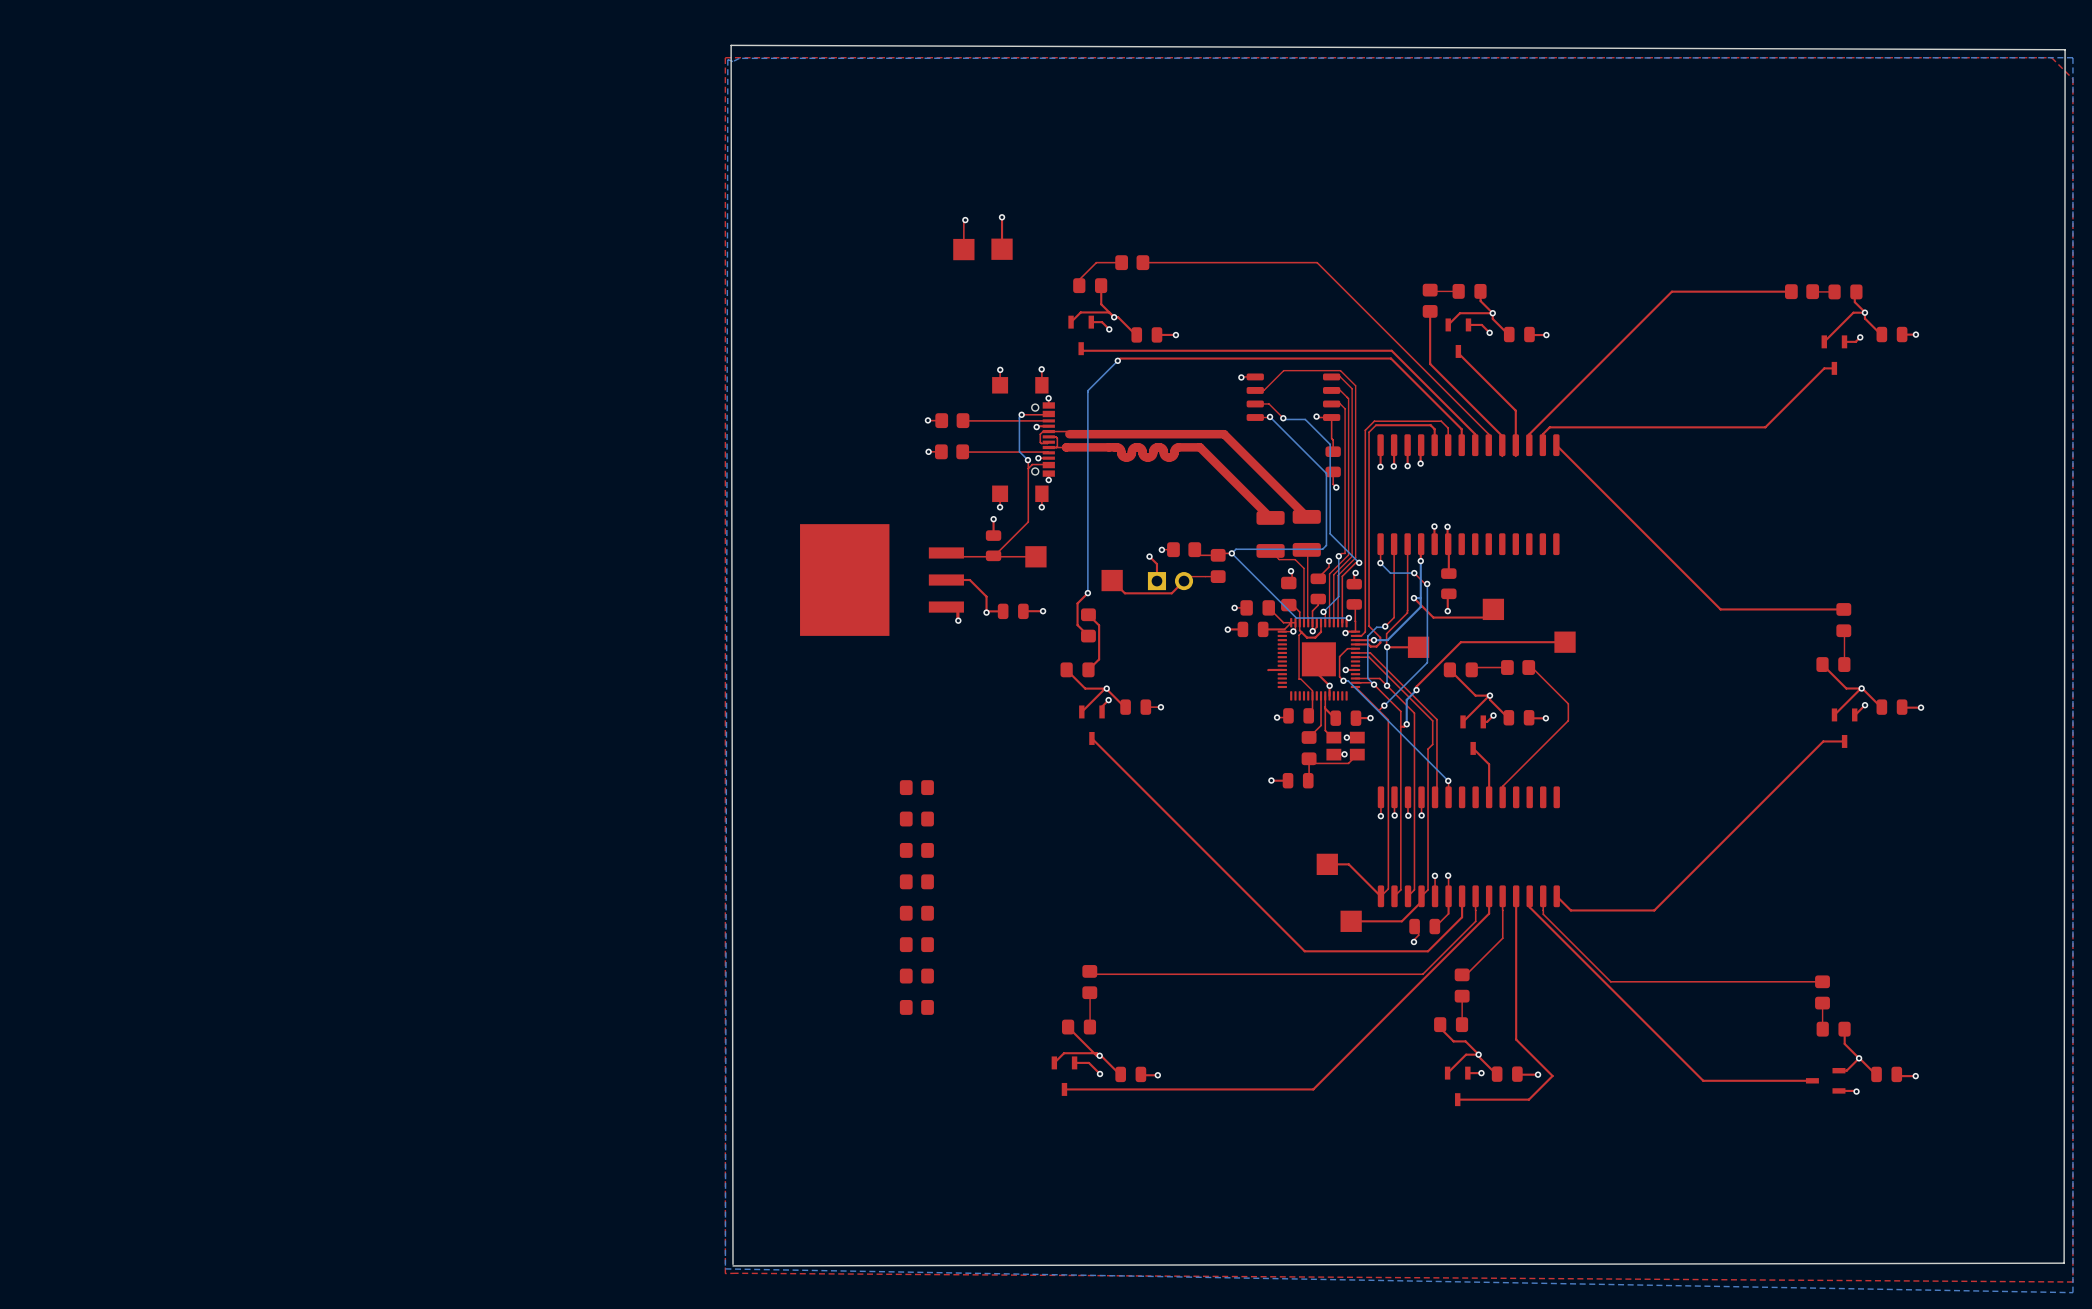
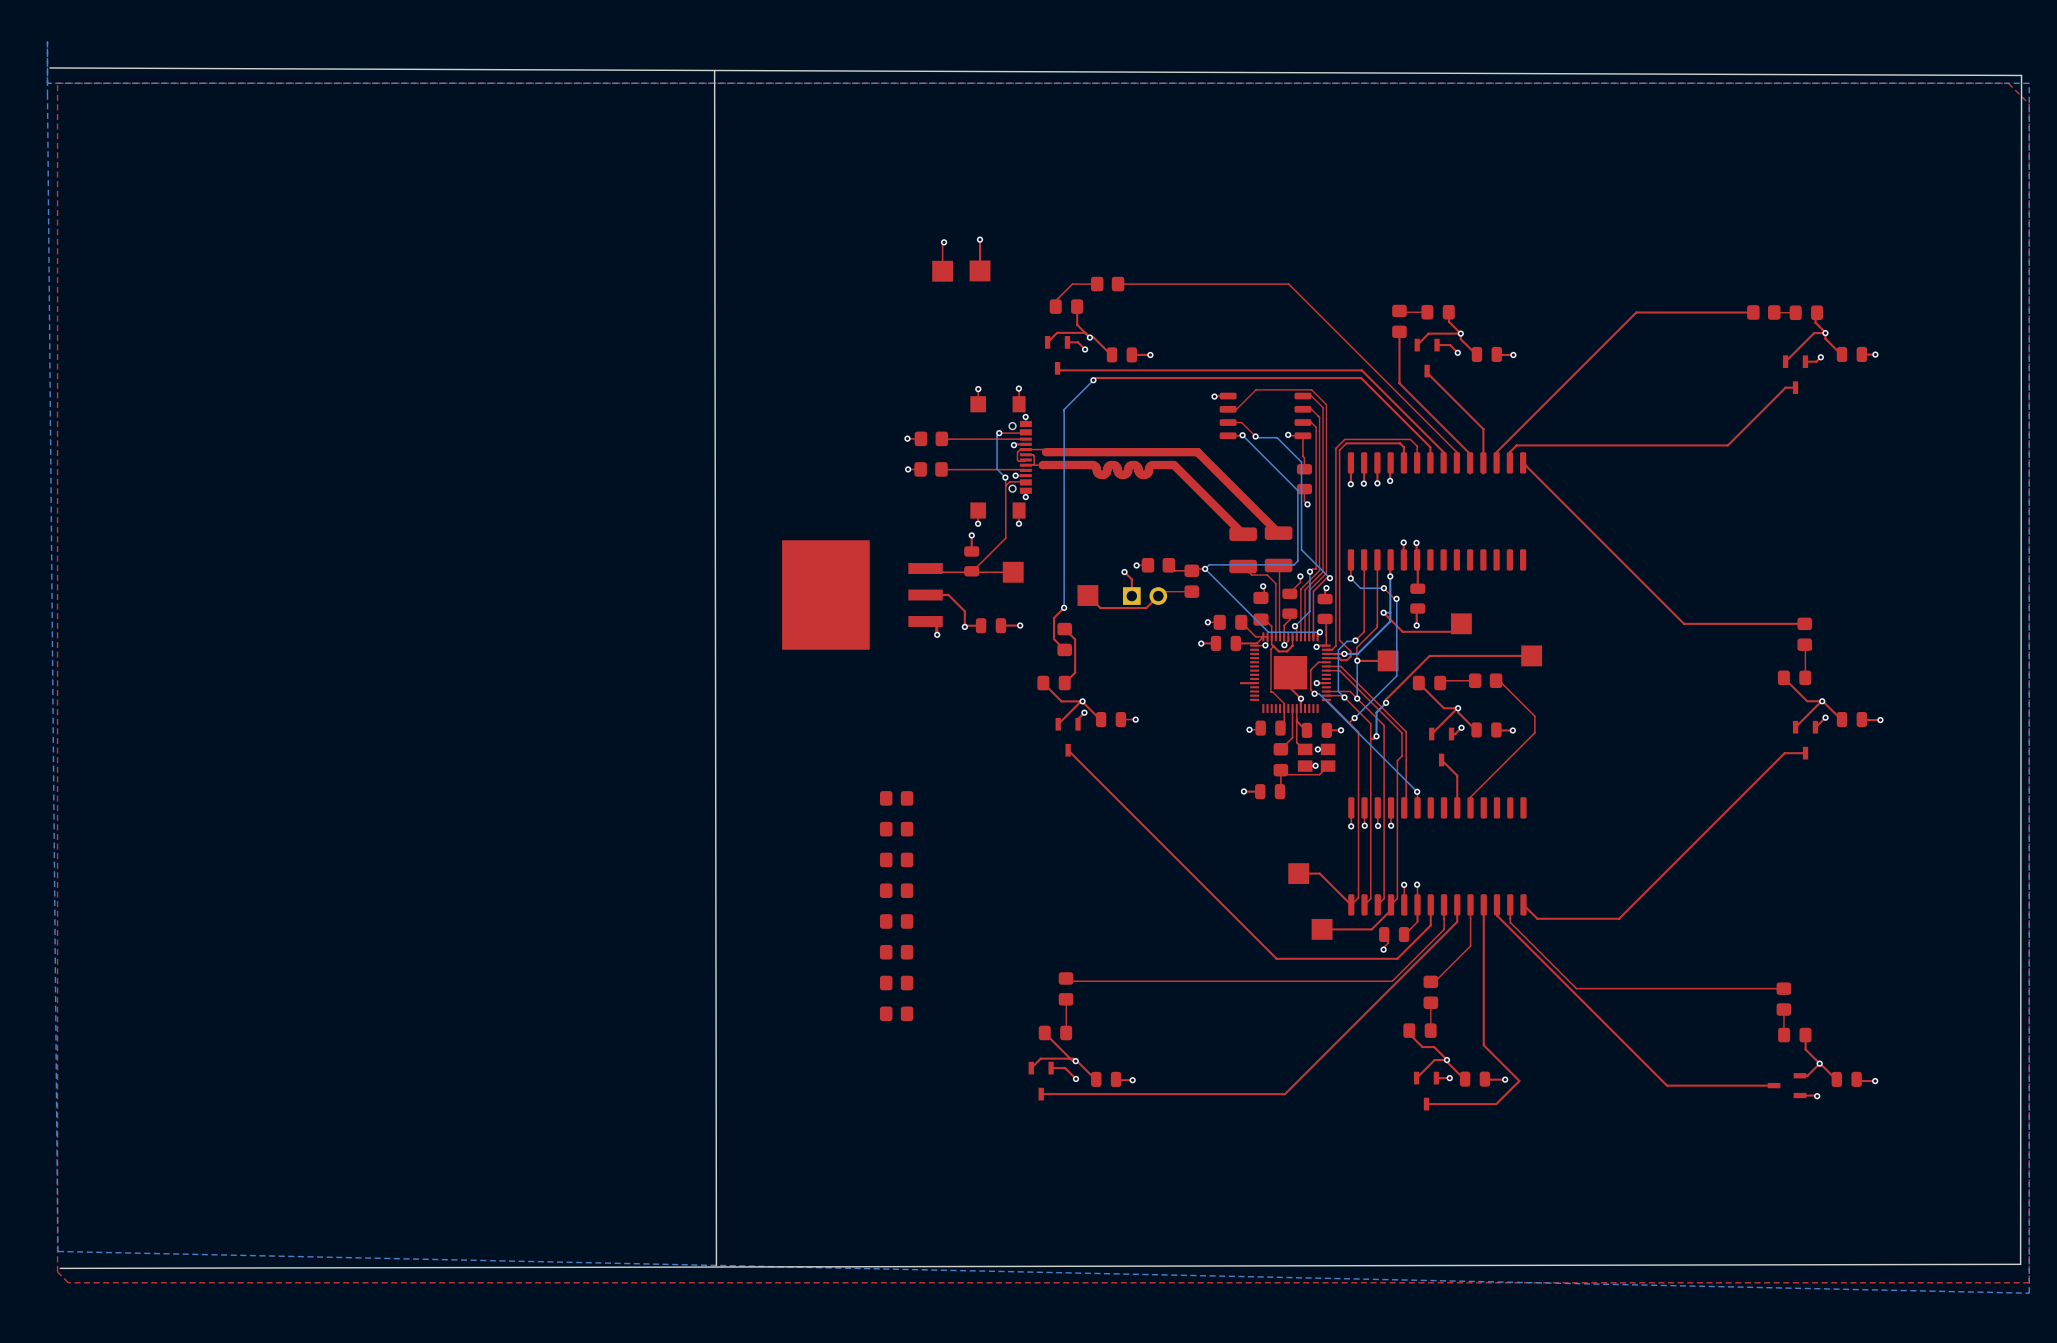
board edge: (731, 45) (2065, 49) -> (49, 67) (2021, 75)
top zone outline: (725, 57) (725, 1273) (2072, 1282) -> (708, 83) (57, 83) (57, 1272) (68, 1282) (2029, 1282)
bottom zone outline: (2072, 57) (739, 58) (733, 61) (727, 59) (725, 1268) (2072, 1292) -> (47, 41) (57, 1251) (2029, 1293)
bottom zone outline: none -> (2029, 83) (47, 83)
board edge: none -> (716, 1267) (60, 1268)

